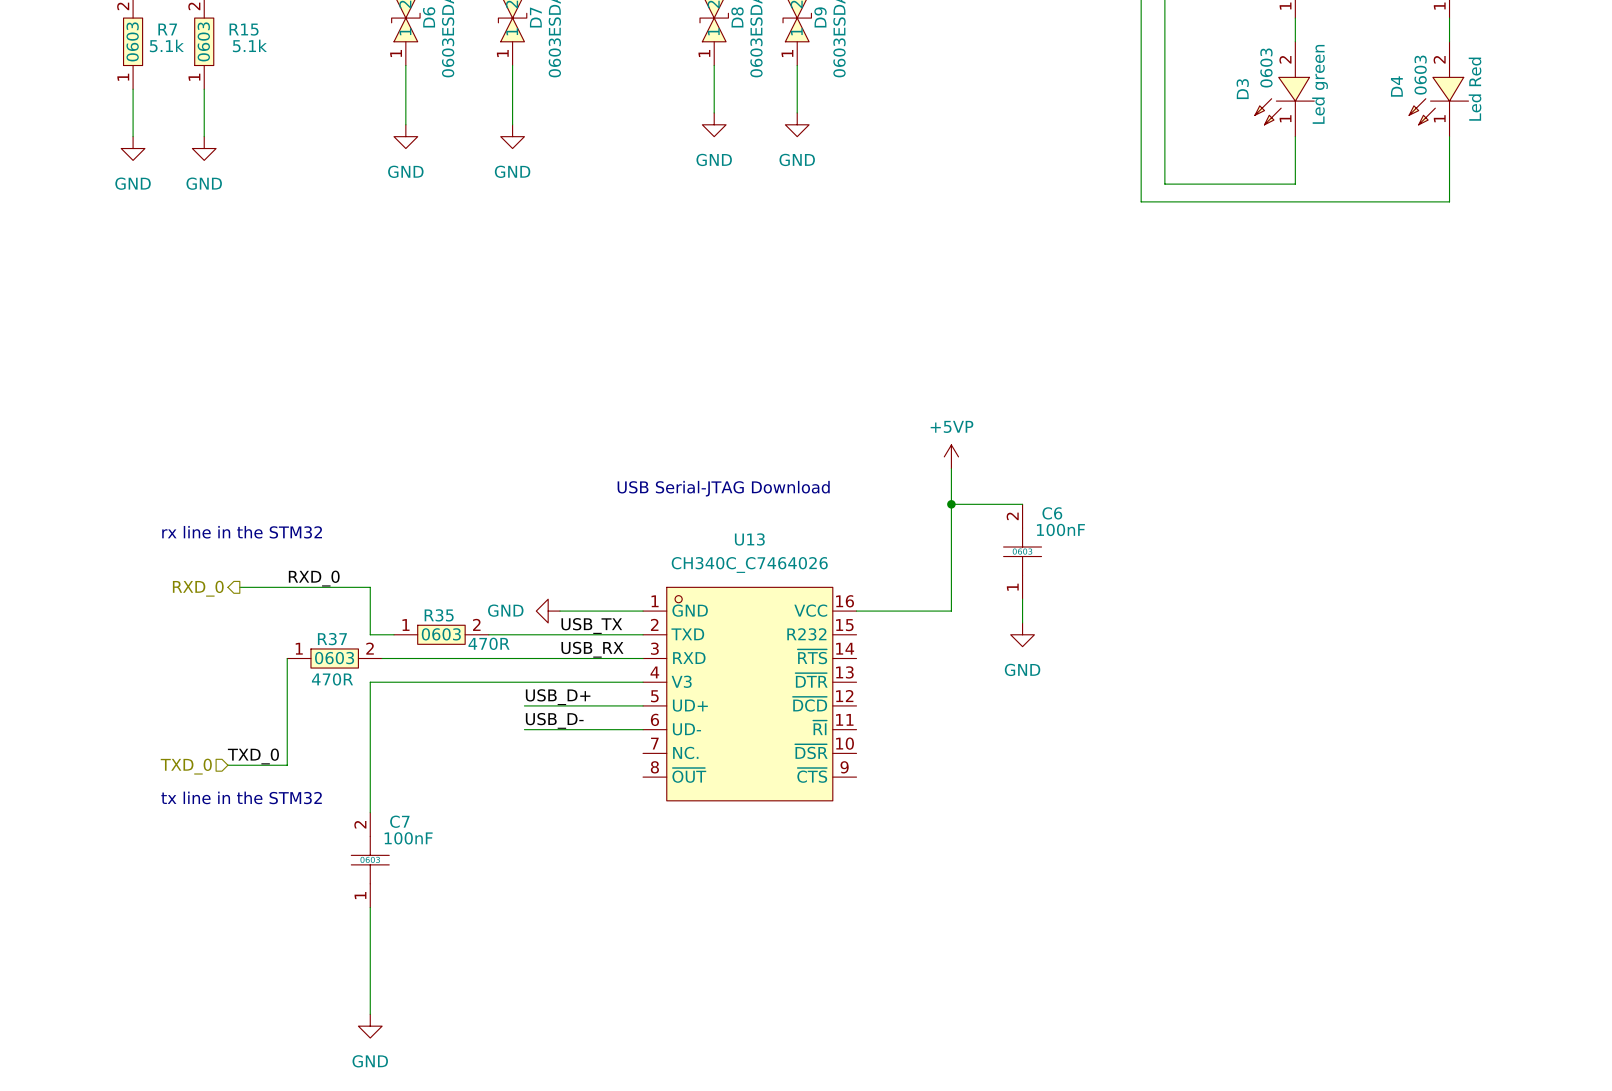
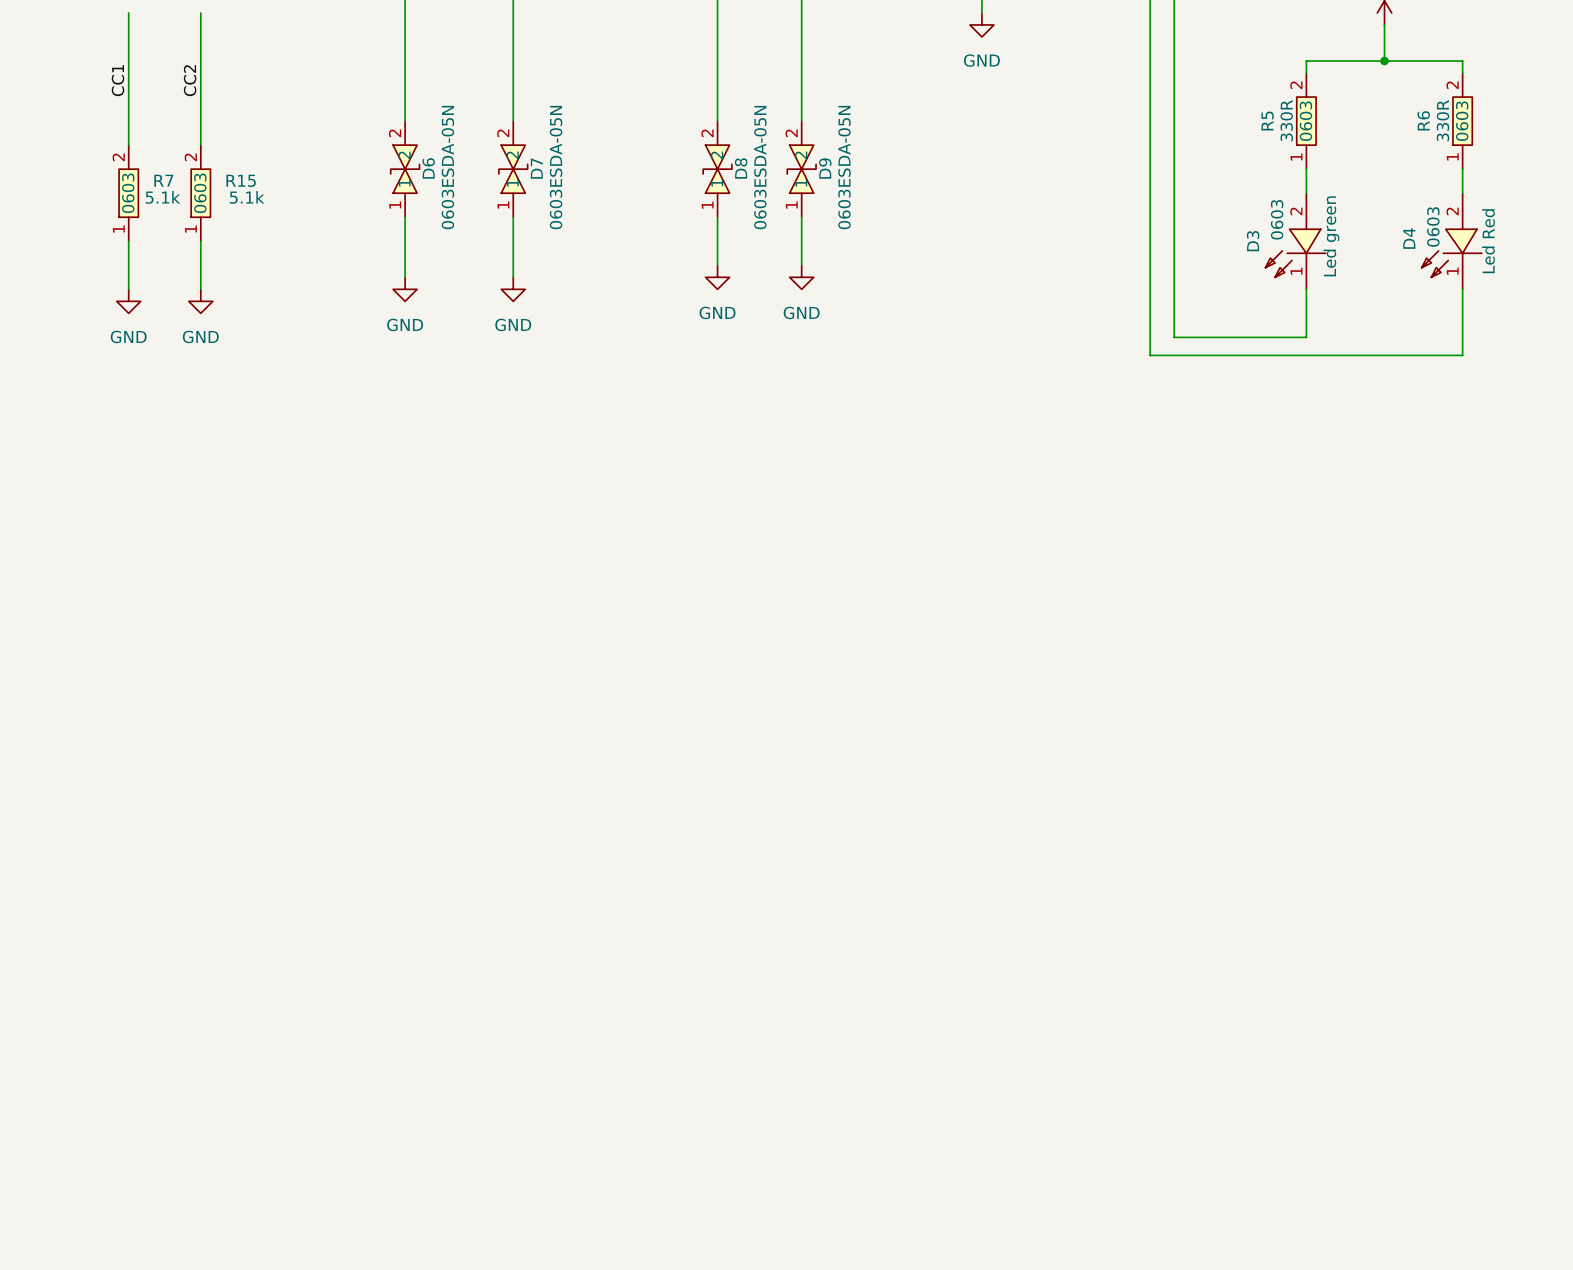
power symbol: +5VP (951, 456) -> none
wire: (951, 468) (951, 611) (856, 611) -> none
text: USB Serial-JTAG Download (723, 488) -> none
wire: (951, 504) (1022, 504) -> none
junction: (951, 504) -> none
text: rx line in the STM32 (242, 532) -> none
C6: (1022, 551) -> none
label: RXD_0 (314, 578) -> none
wire: (239, 587) (370, 587) (370, 634) (393, 634) -> none
hierarchical label: RXD_0 (198, 588) -> none
wire: (1022, 599) (1022, 622) -> none
power symbol: GND (548, 611) -> none
wire: (560, 611) (643, 611) -> none
label: USB_TX (591, 626) -> none
R35: (441, 634) -> none
wire: (488, 634) (643, 634) -> none
power symbol: GND (1022, 634) -> none
label: USB_RX (592, 649) -> none
wire: (287, 658) (287, 765) (227, 765) -> none
R37: (334, 658) -> none
wire: (382, 658) (643, 658) -> none
wire: (643, 682) (370, 682) (370, 812) -> none
U13: CH340C_C7464026 (749, 694) -> none
label: USB_D+ (558, 697) -> none
wire: (524, 705) (643, 705) -> none
label: USB_D- (554, 720) -> none
wire: (524, 729) (643, 729) -> none
label: TXD_0 (253, 756) -> none
hierarchical label: TXD_0 (186, 766) -> none
text: tx line in the STM32 (241, 797) -> none
C7: (370, 860) -> none
wire: (370, 907) (370, 1014) -> none
power symbol: GND (370, 1026) -> none

